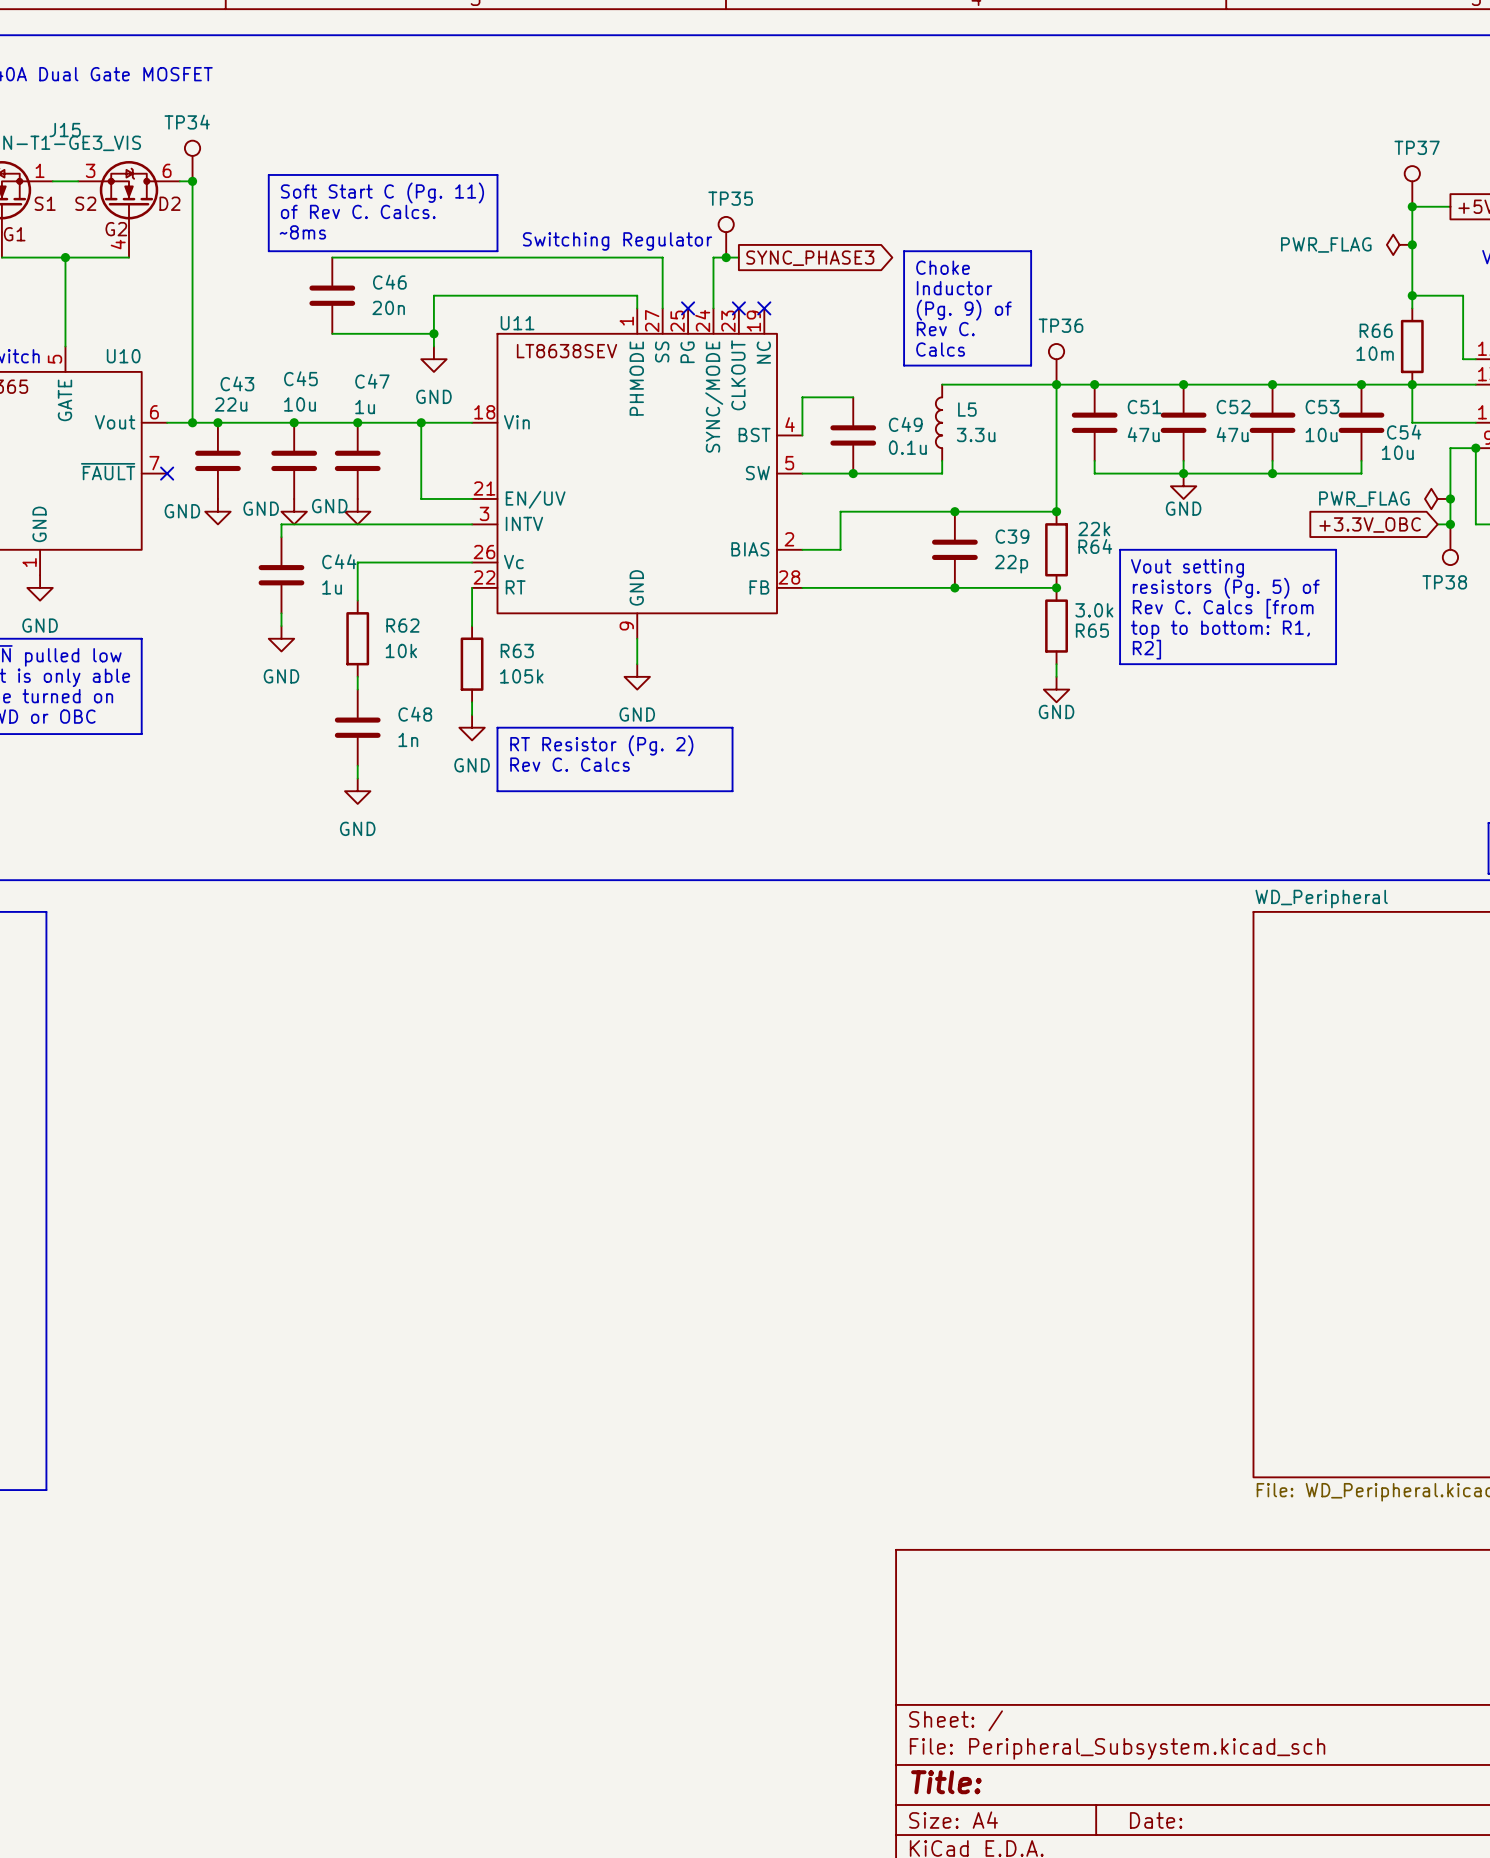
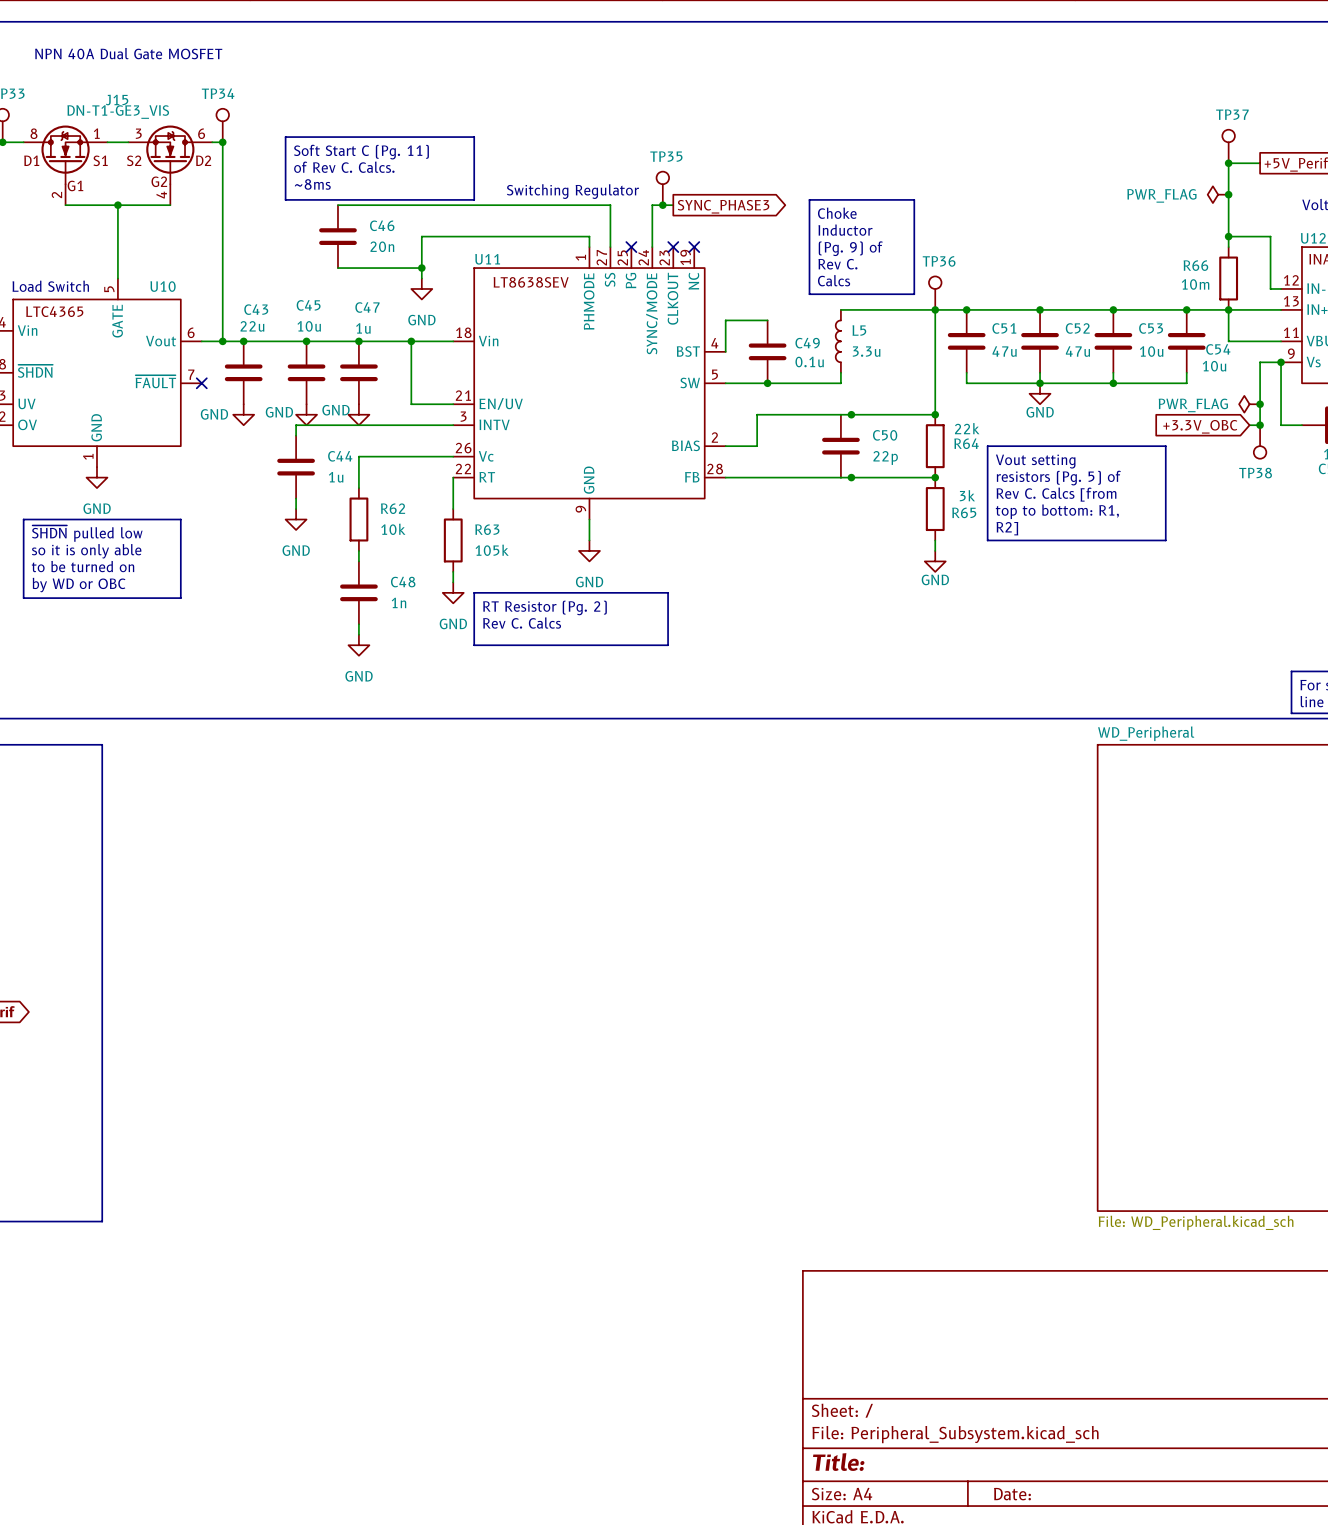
C50: none -> 22p (840, 446)
C39: 22p (954, 549) -> none
R65 value: 3.0k (1094, 610) -> 3k (967, 495)

